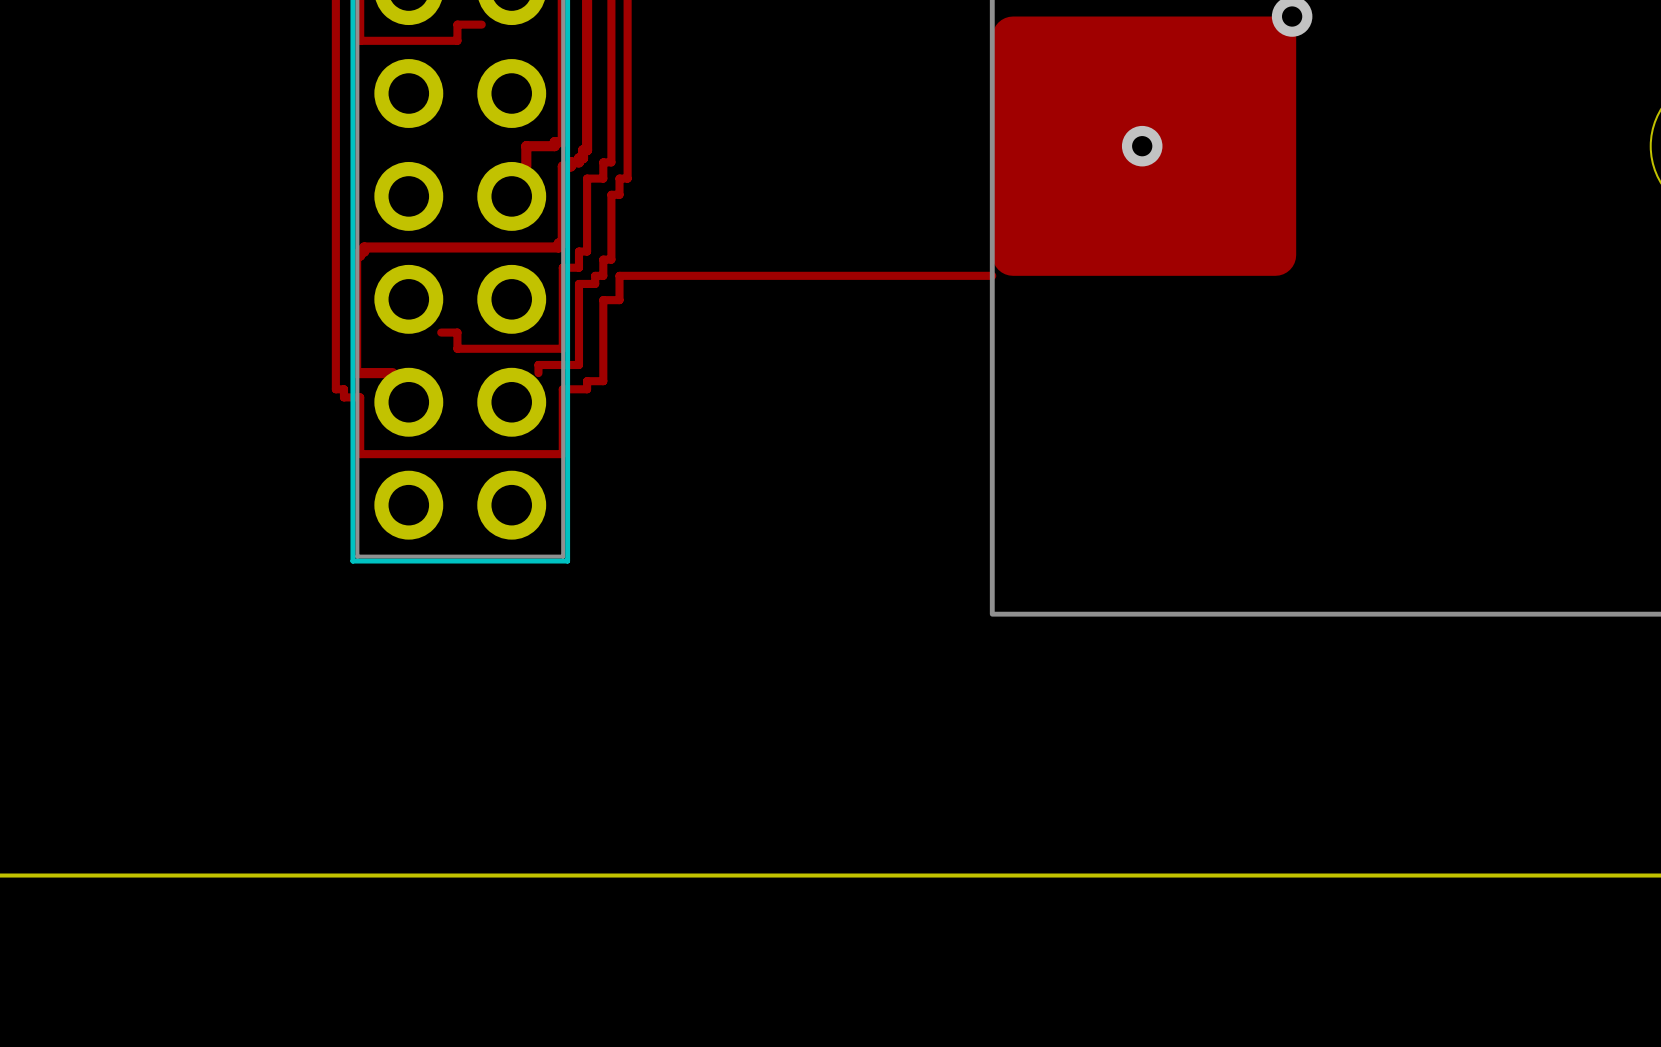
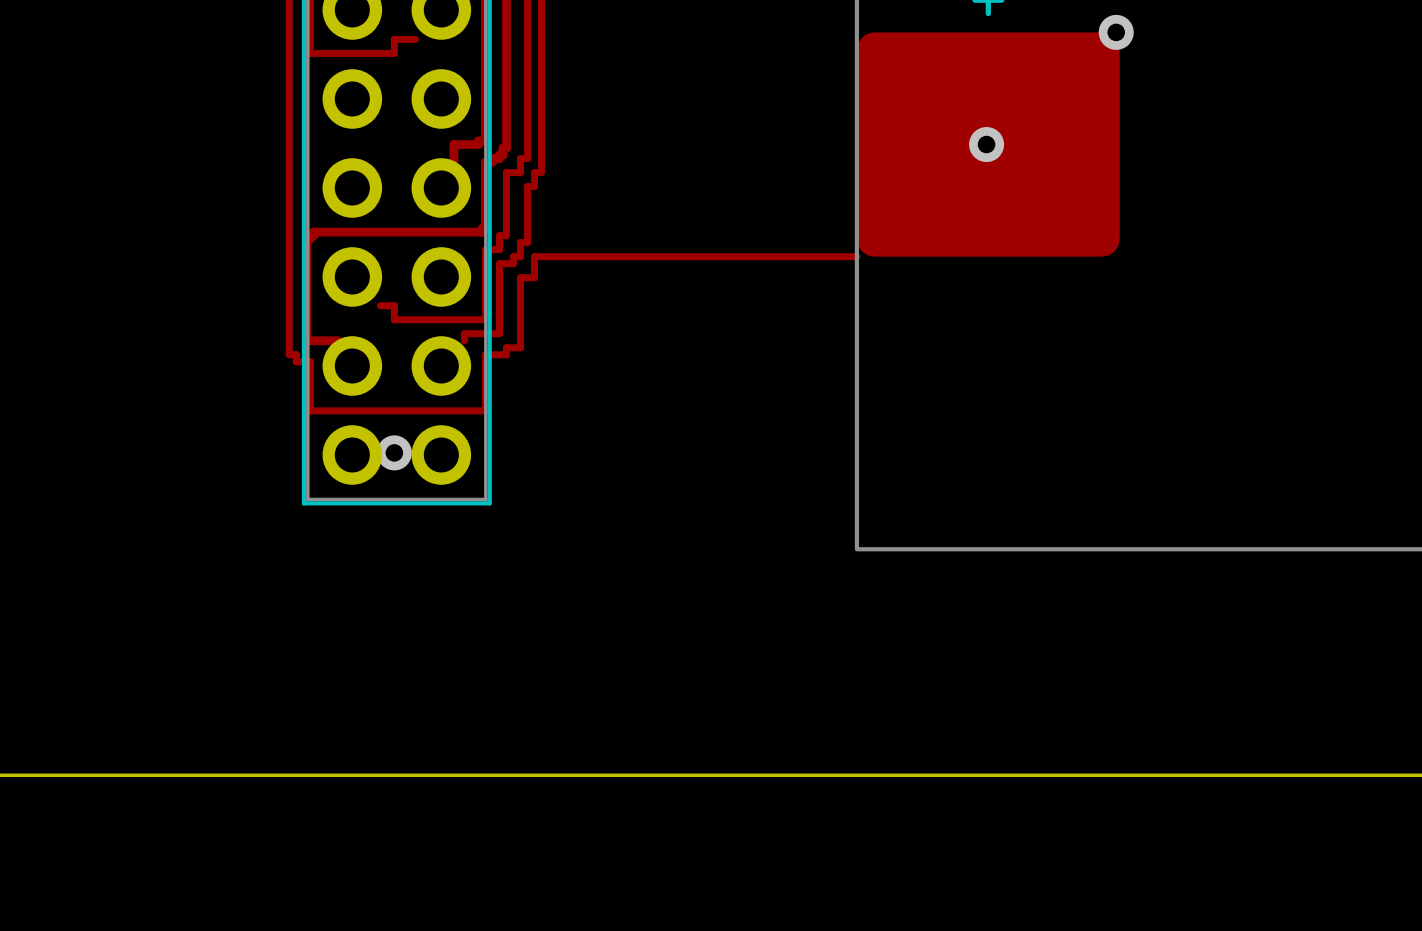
via: none -> (394, 452)

